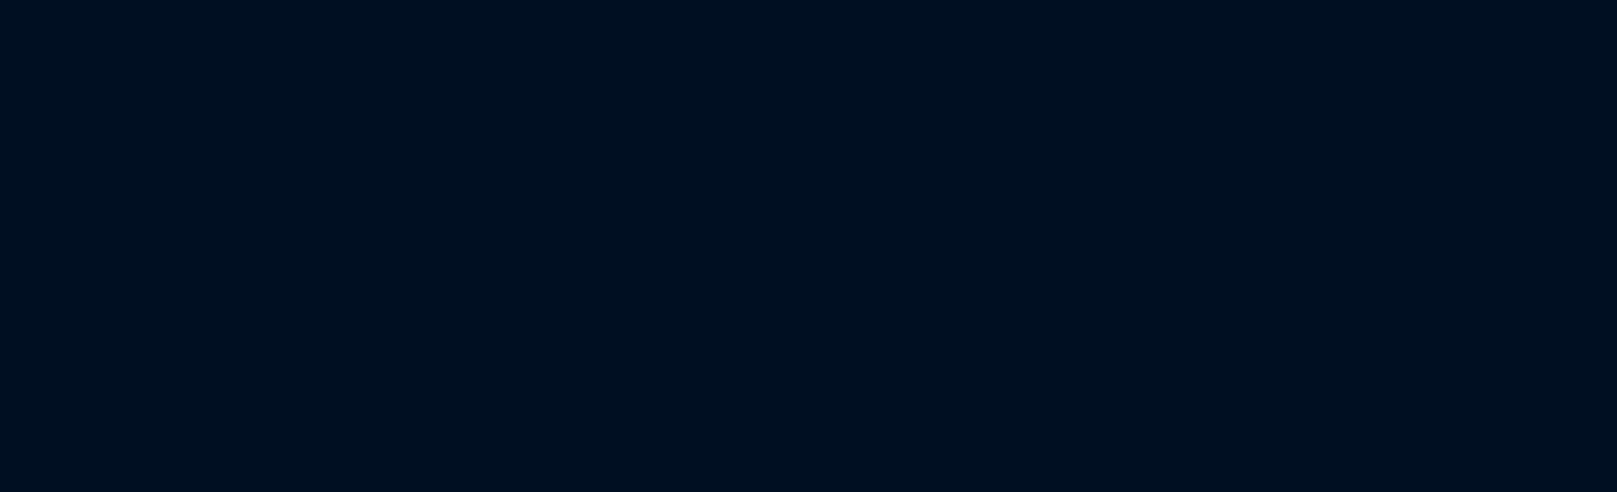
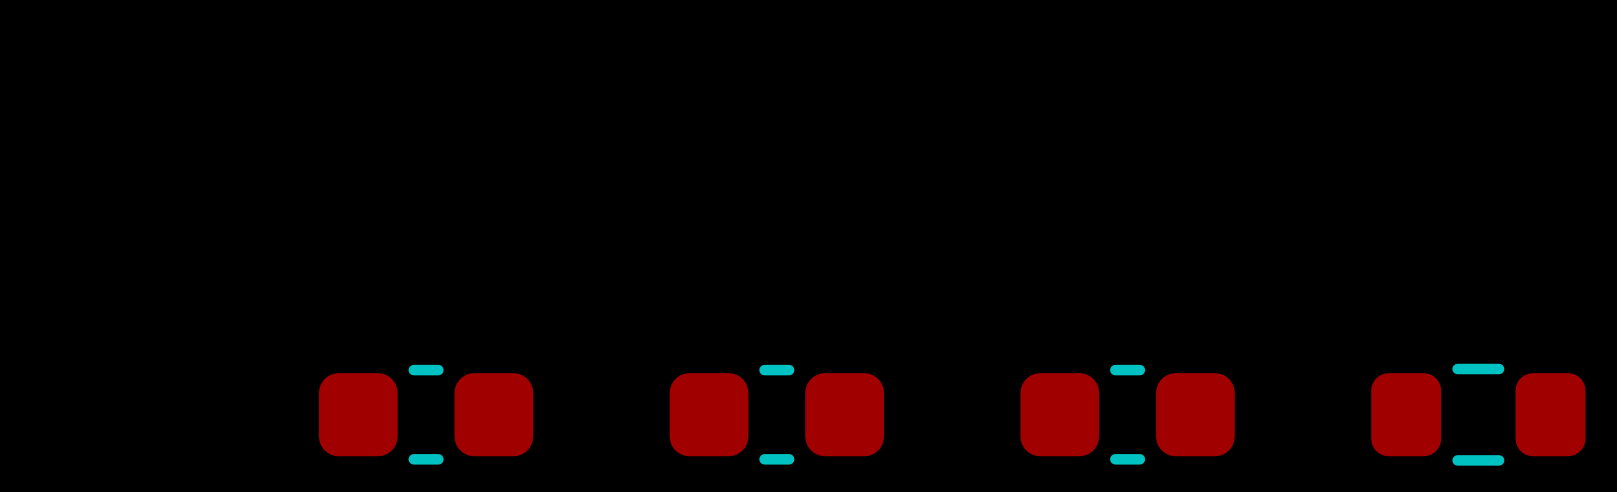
part: none -> (426, 414)
part: none -> (776, 414)
part: none -> (1127, 414)
part: none -> (1478, 414)

